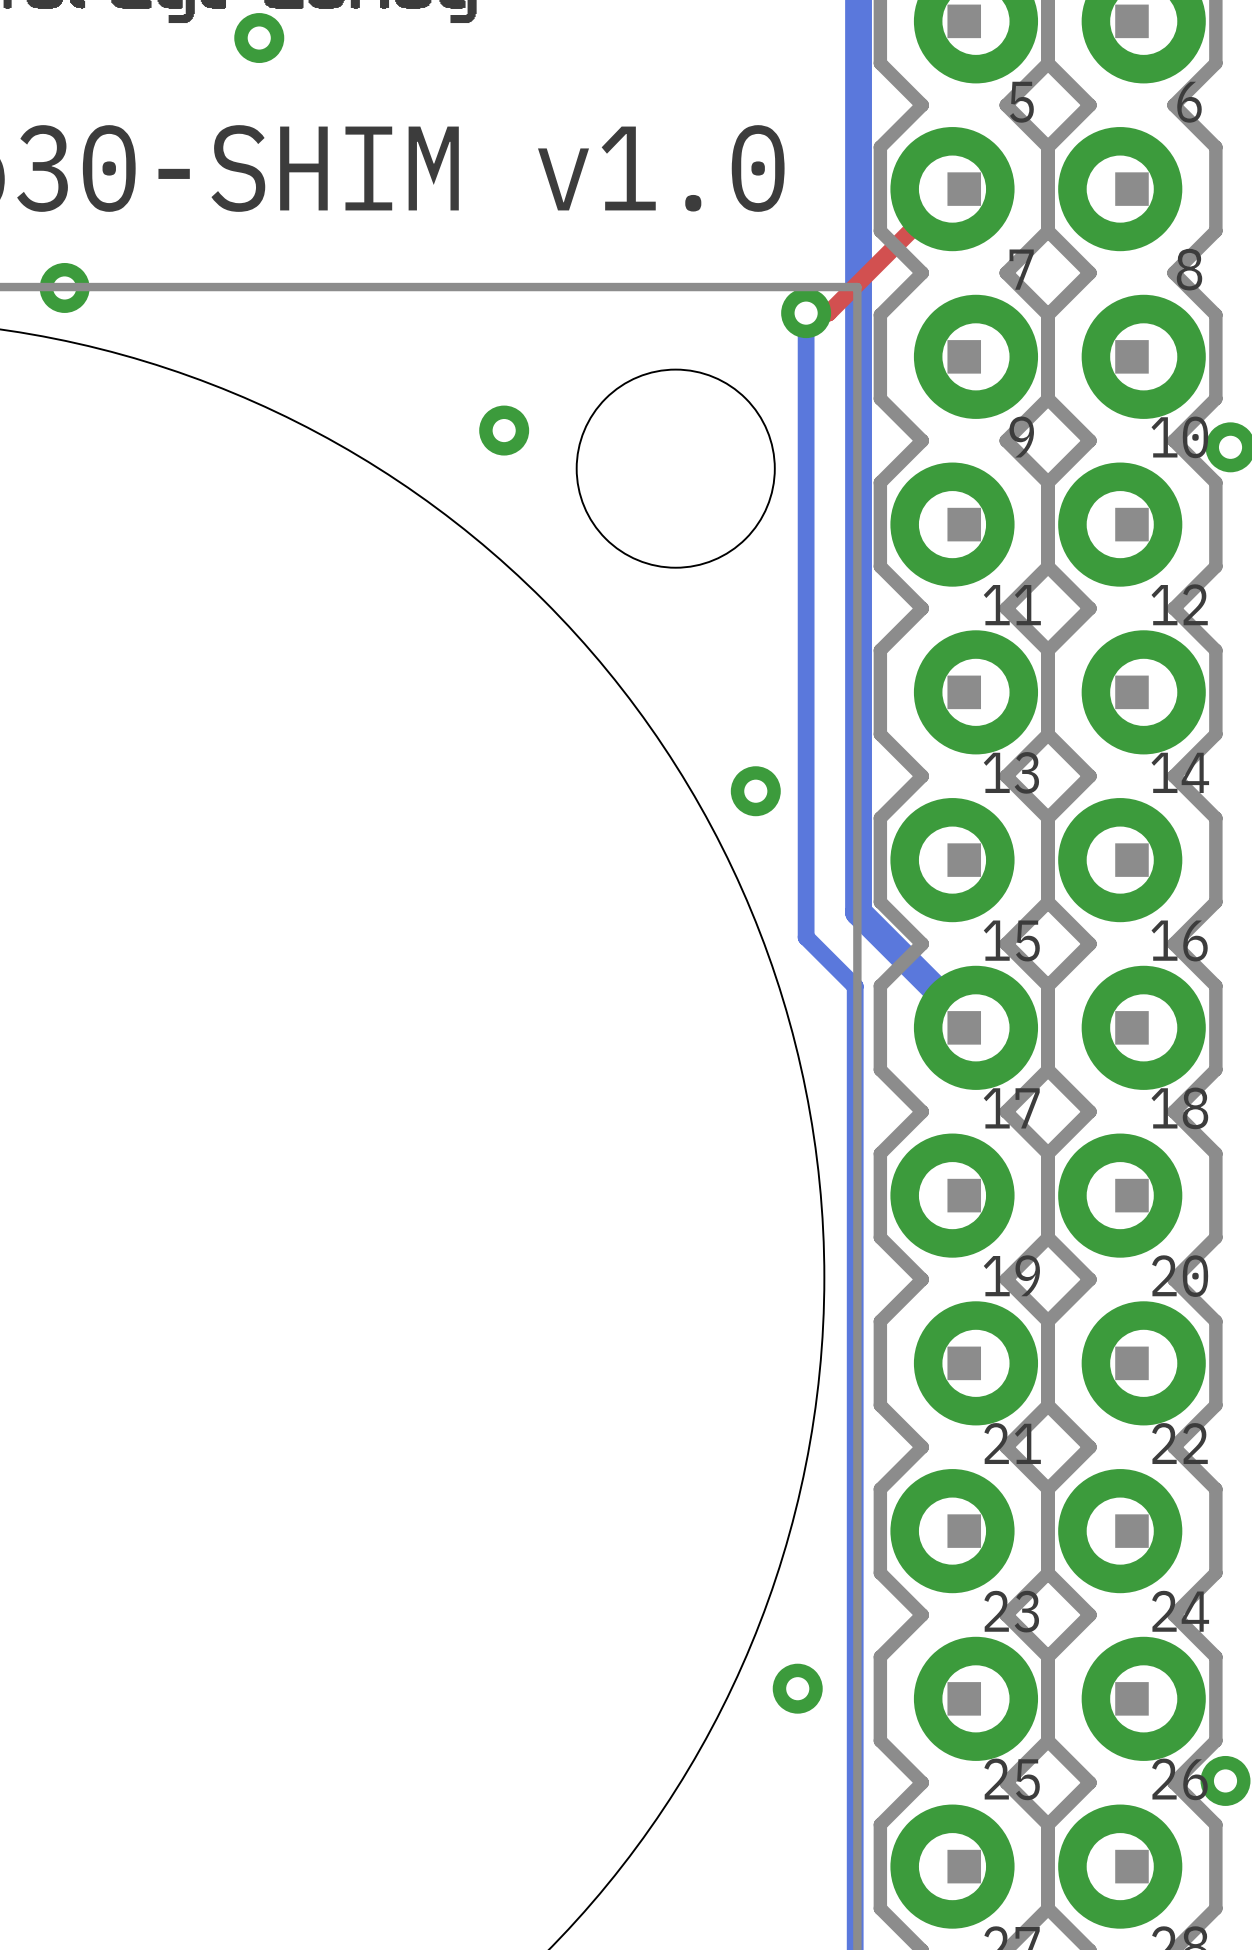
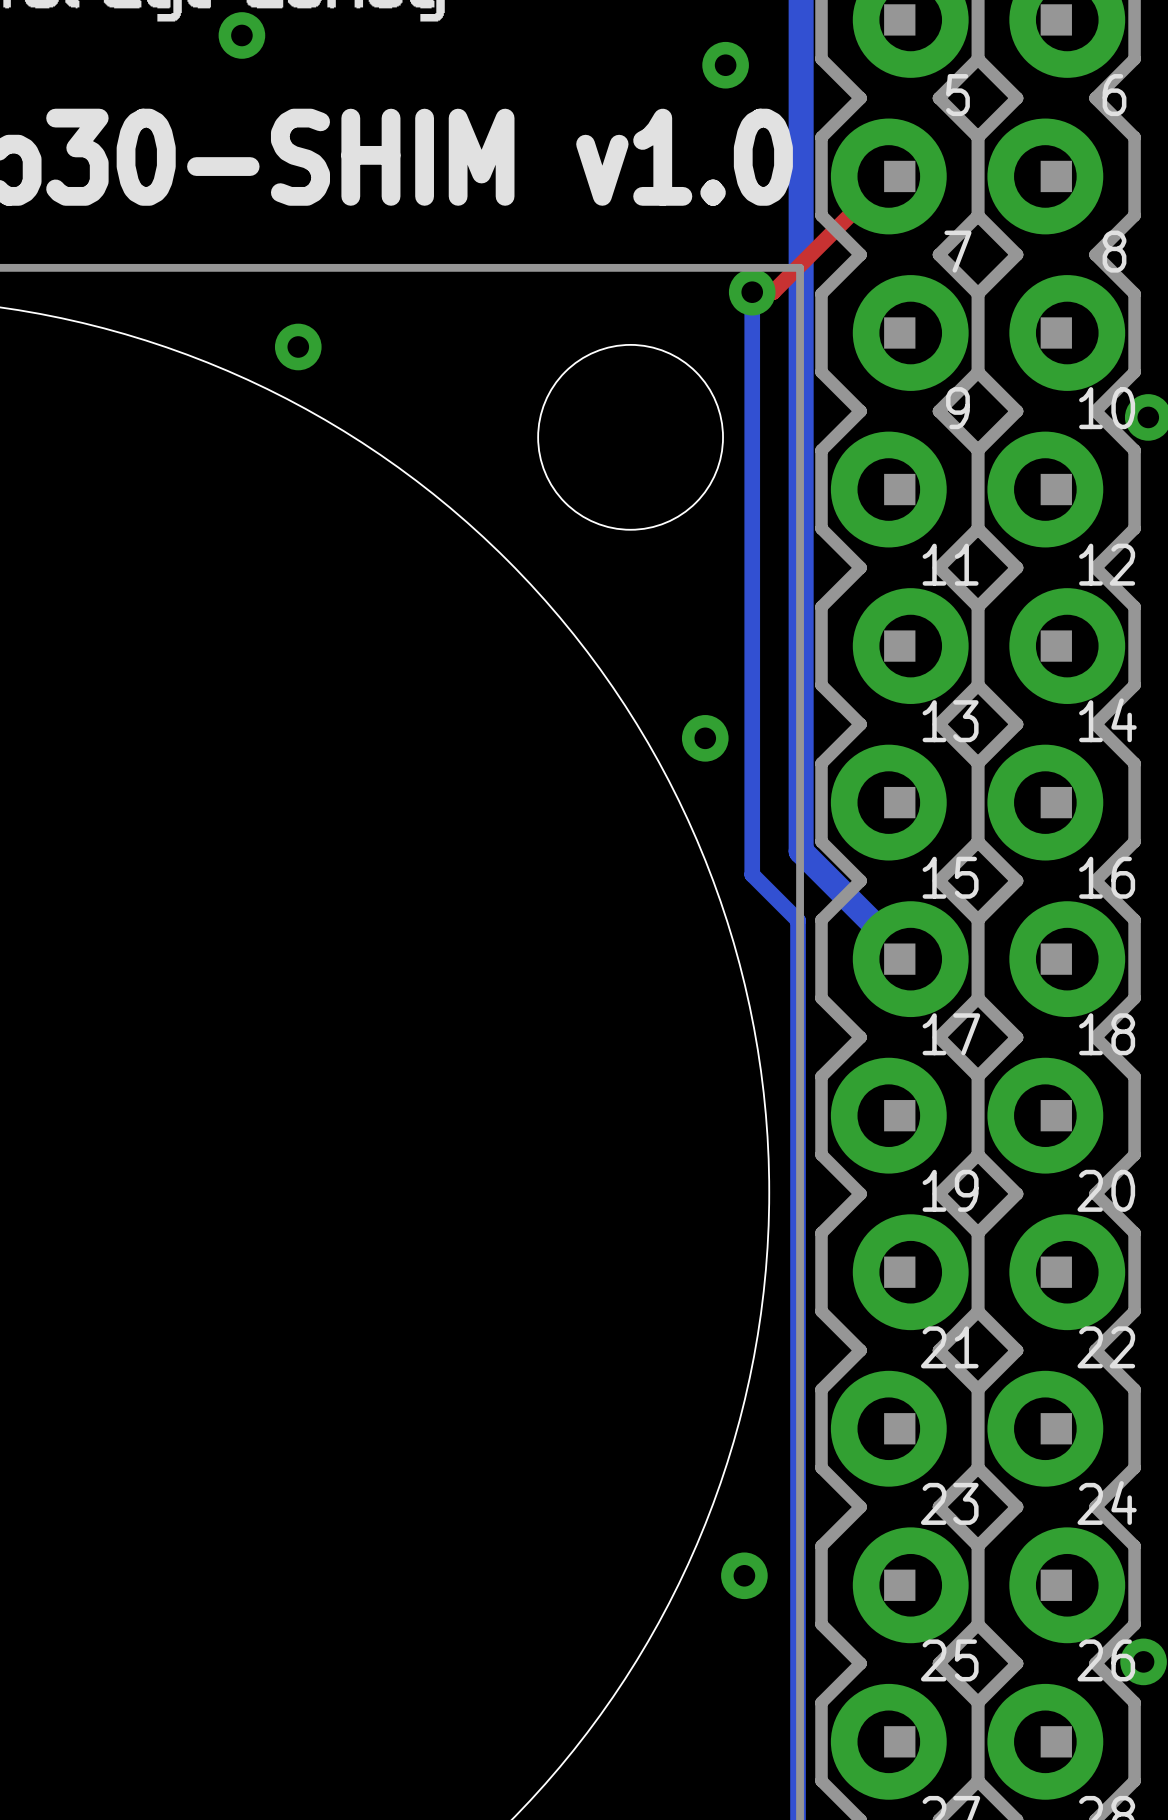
via: none -> (725, 65)
via: (64, 287) -> none
via: none -> (298, 346)
via: (504, 430) -> none

